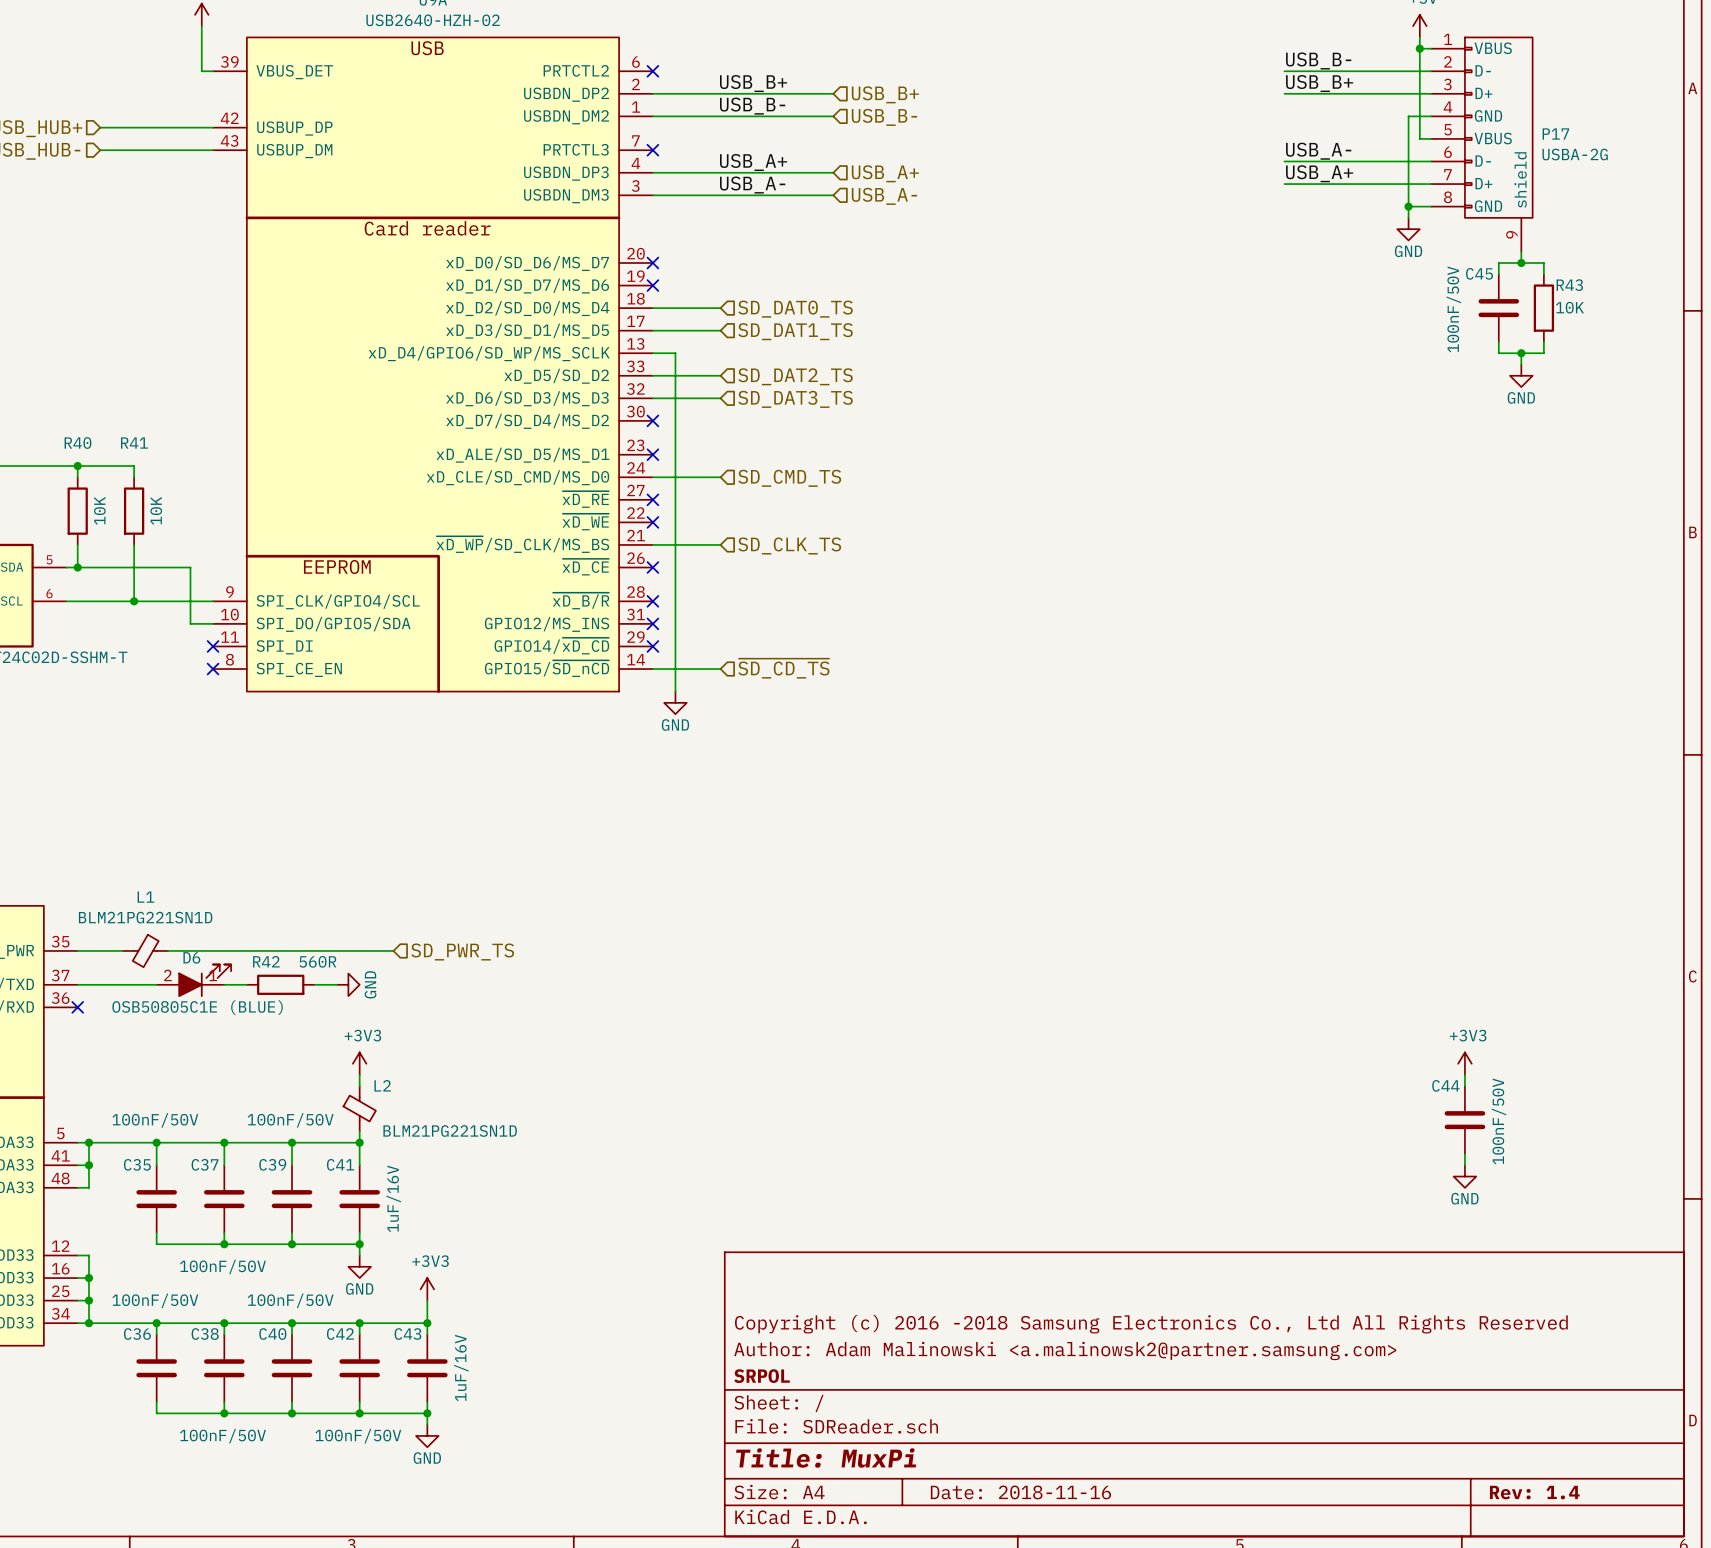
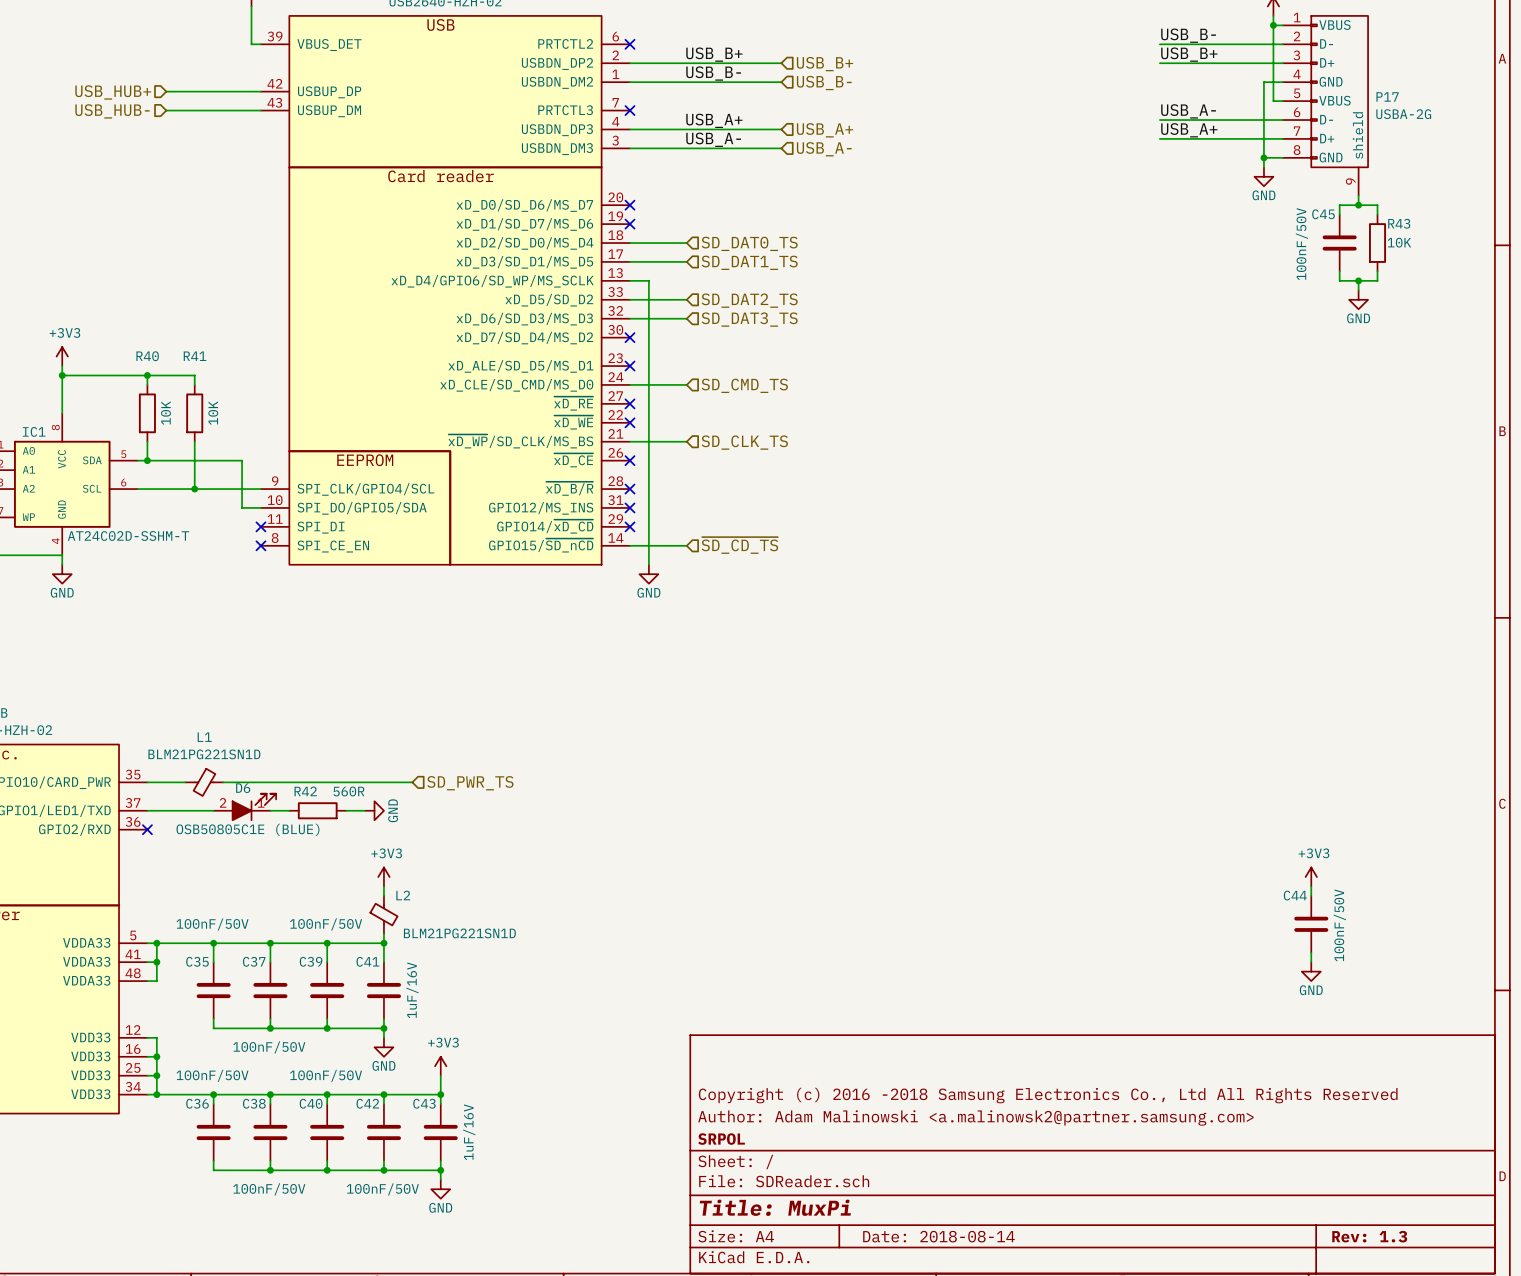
title block: Date: 2018-11-16 (1020, 1492) -> Date: 2018-08-14 (938, 1236)
title block: Rev: 1.4 (1534, 1492) -> Rev: 1.3 (1369, 1236)

